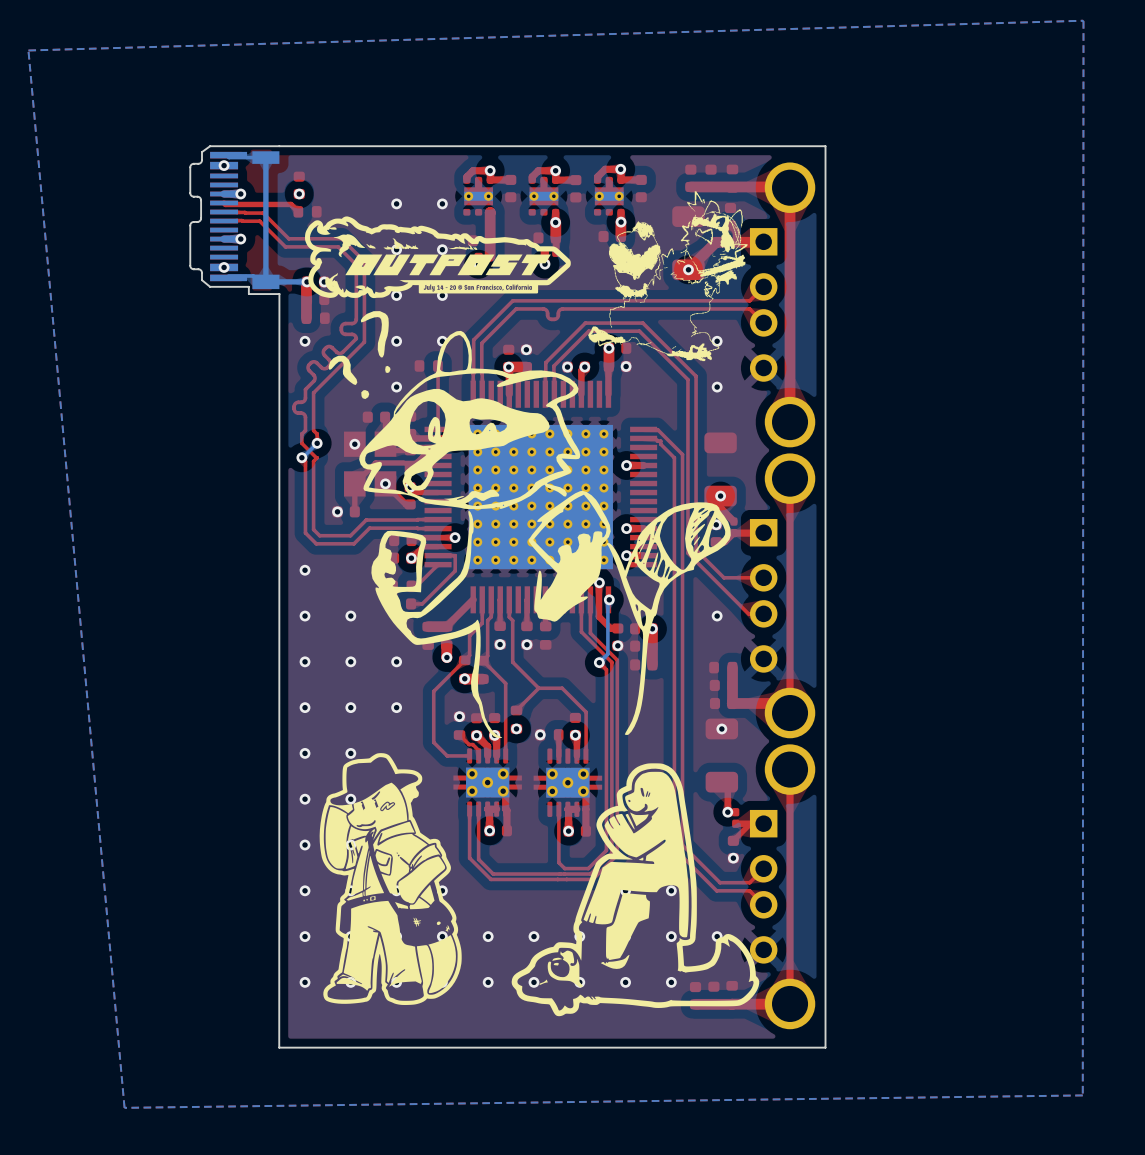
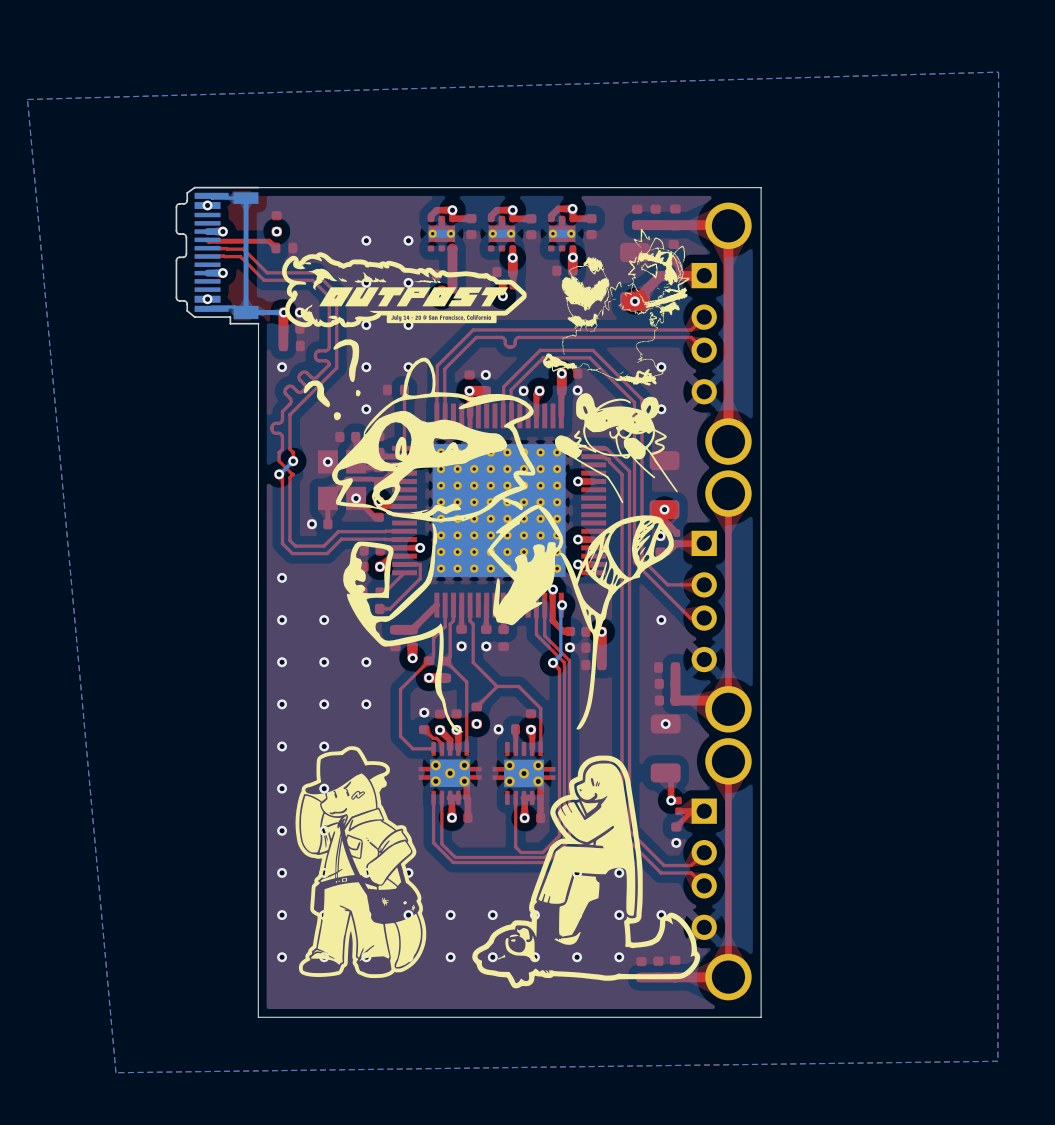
drawing: none -> [554, 393, 678, 504]

